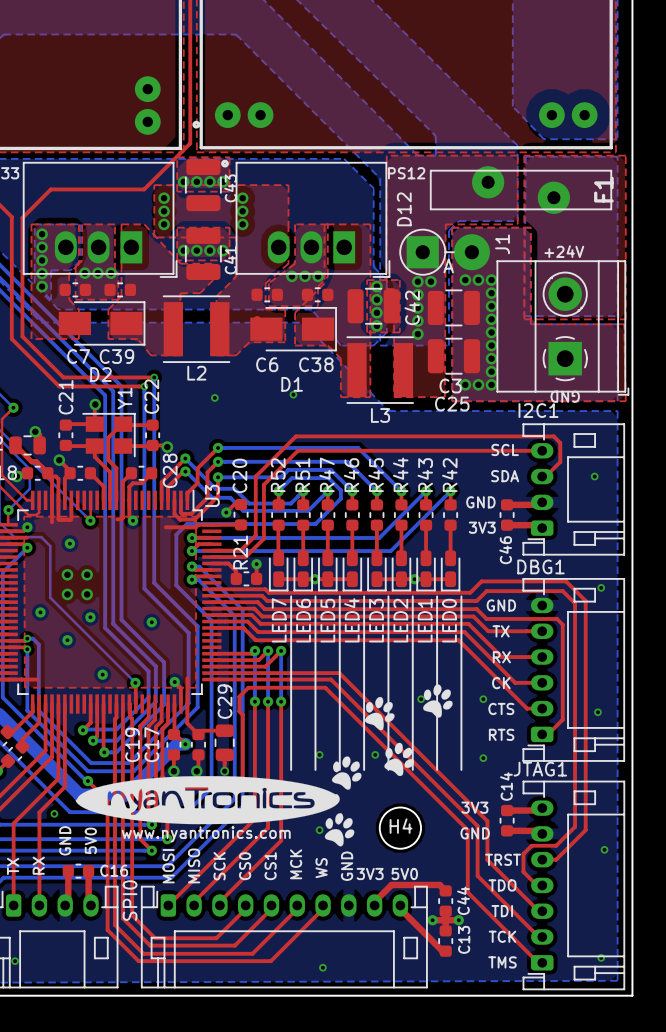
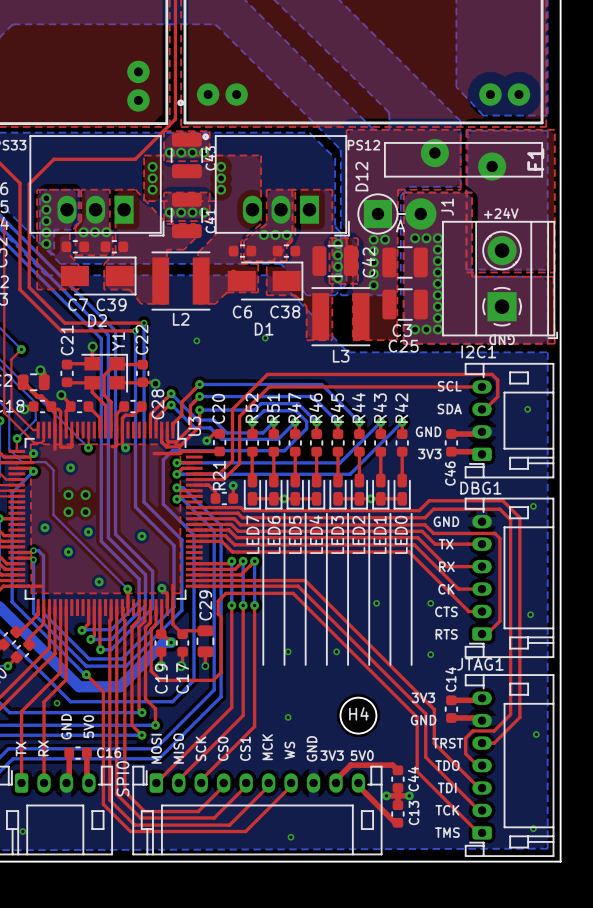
drawing: [75, 684, 453, 847] -> none
C19 name position: C19 (132, 744) -> C19 (161, 678)
C17 name position: C17 (151, 744) -> C17 (182, 678)
text: www.nyantronics.com (206, 834) -> none

